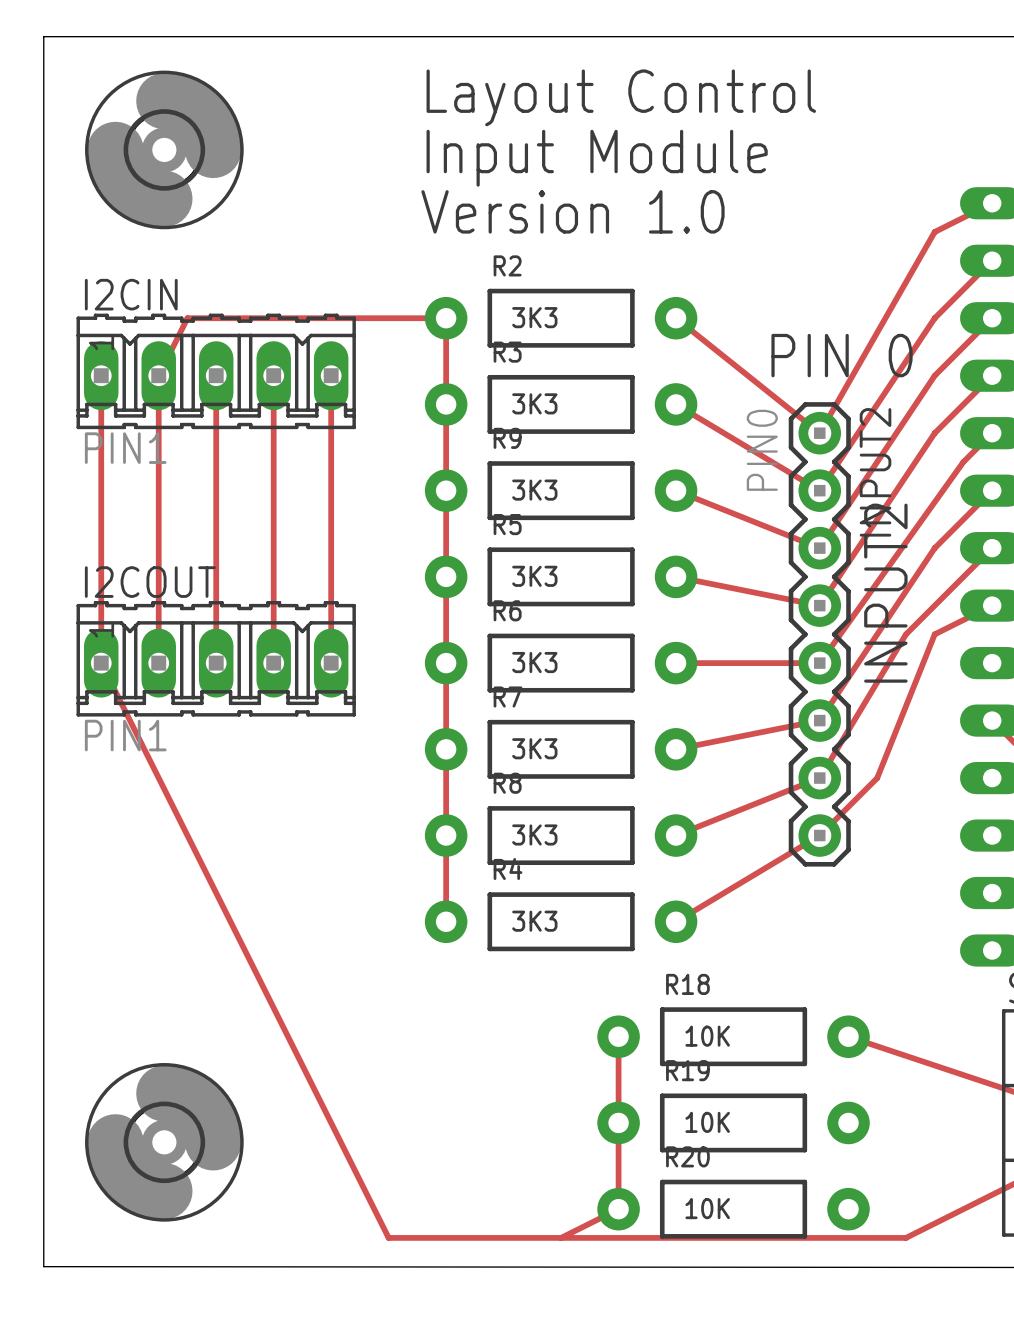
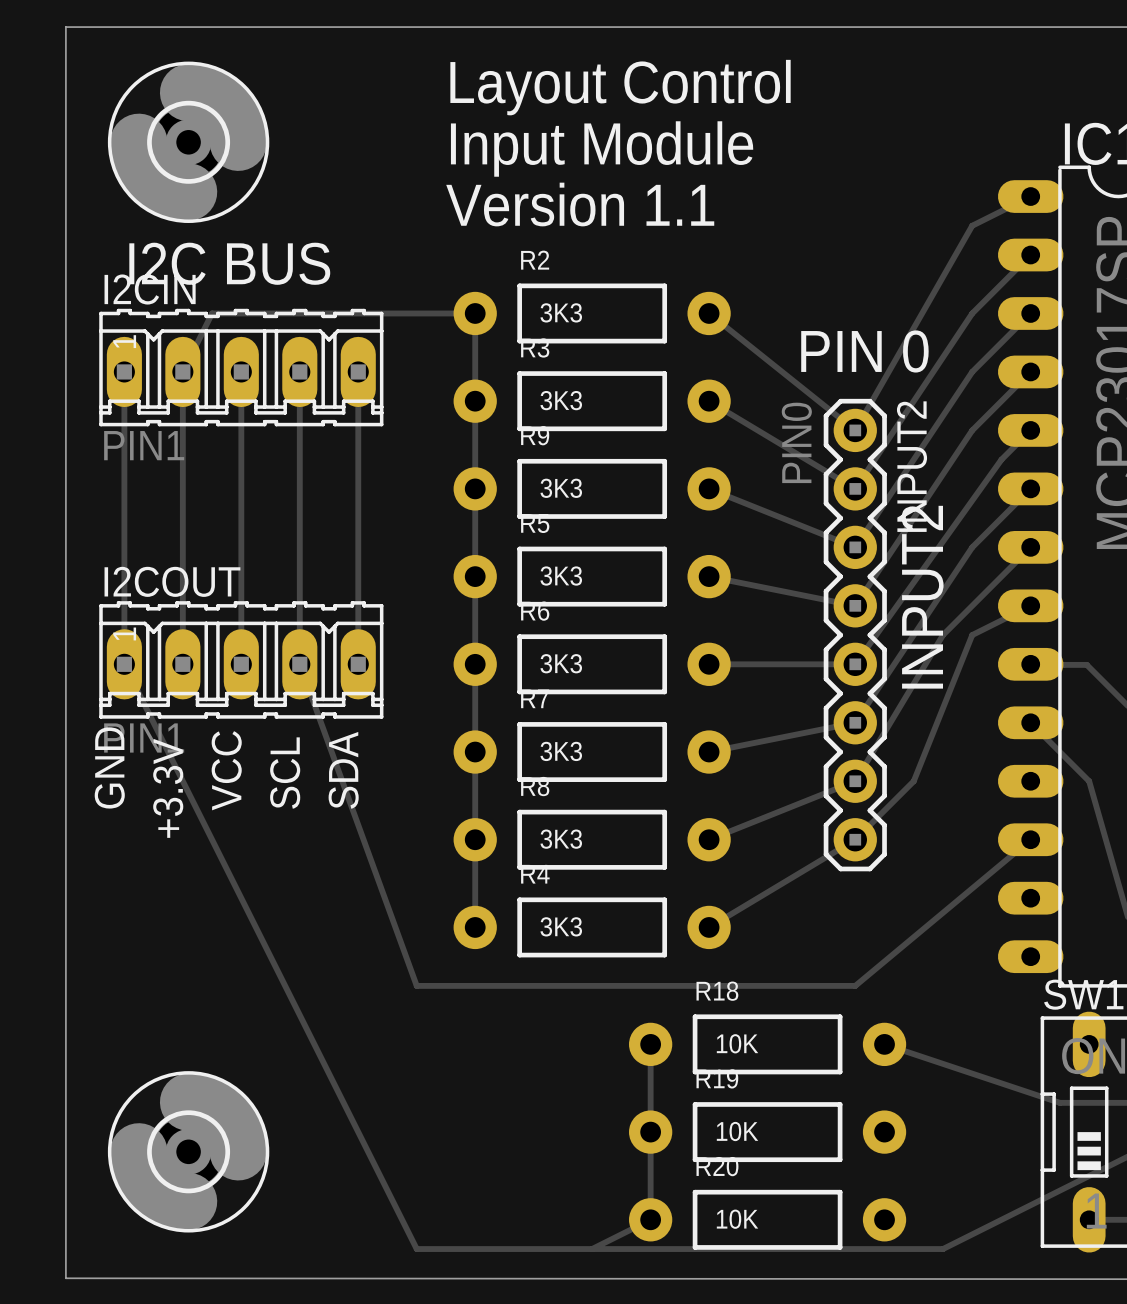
text: Version 1.0 (572, 211) -> Version 1.1 (580, 204)
text: none -> I2C BUS (229, 263)
track: none -> (299, 664) (416, 985) (855, 985) (1030, 839)
text: none -> GND (109, 767)
text: none -> SDA (343, 770)
text: none -> SCL (285, 773)
text: none -> VCC (226, 770)
text: none -> +3.3V (168, 788)

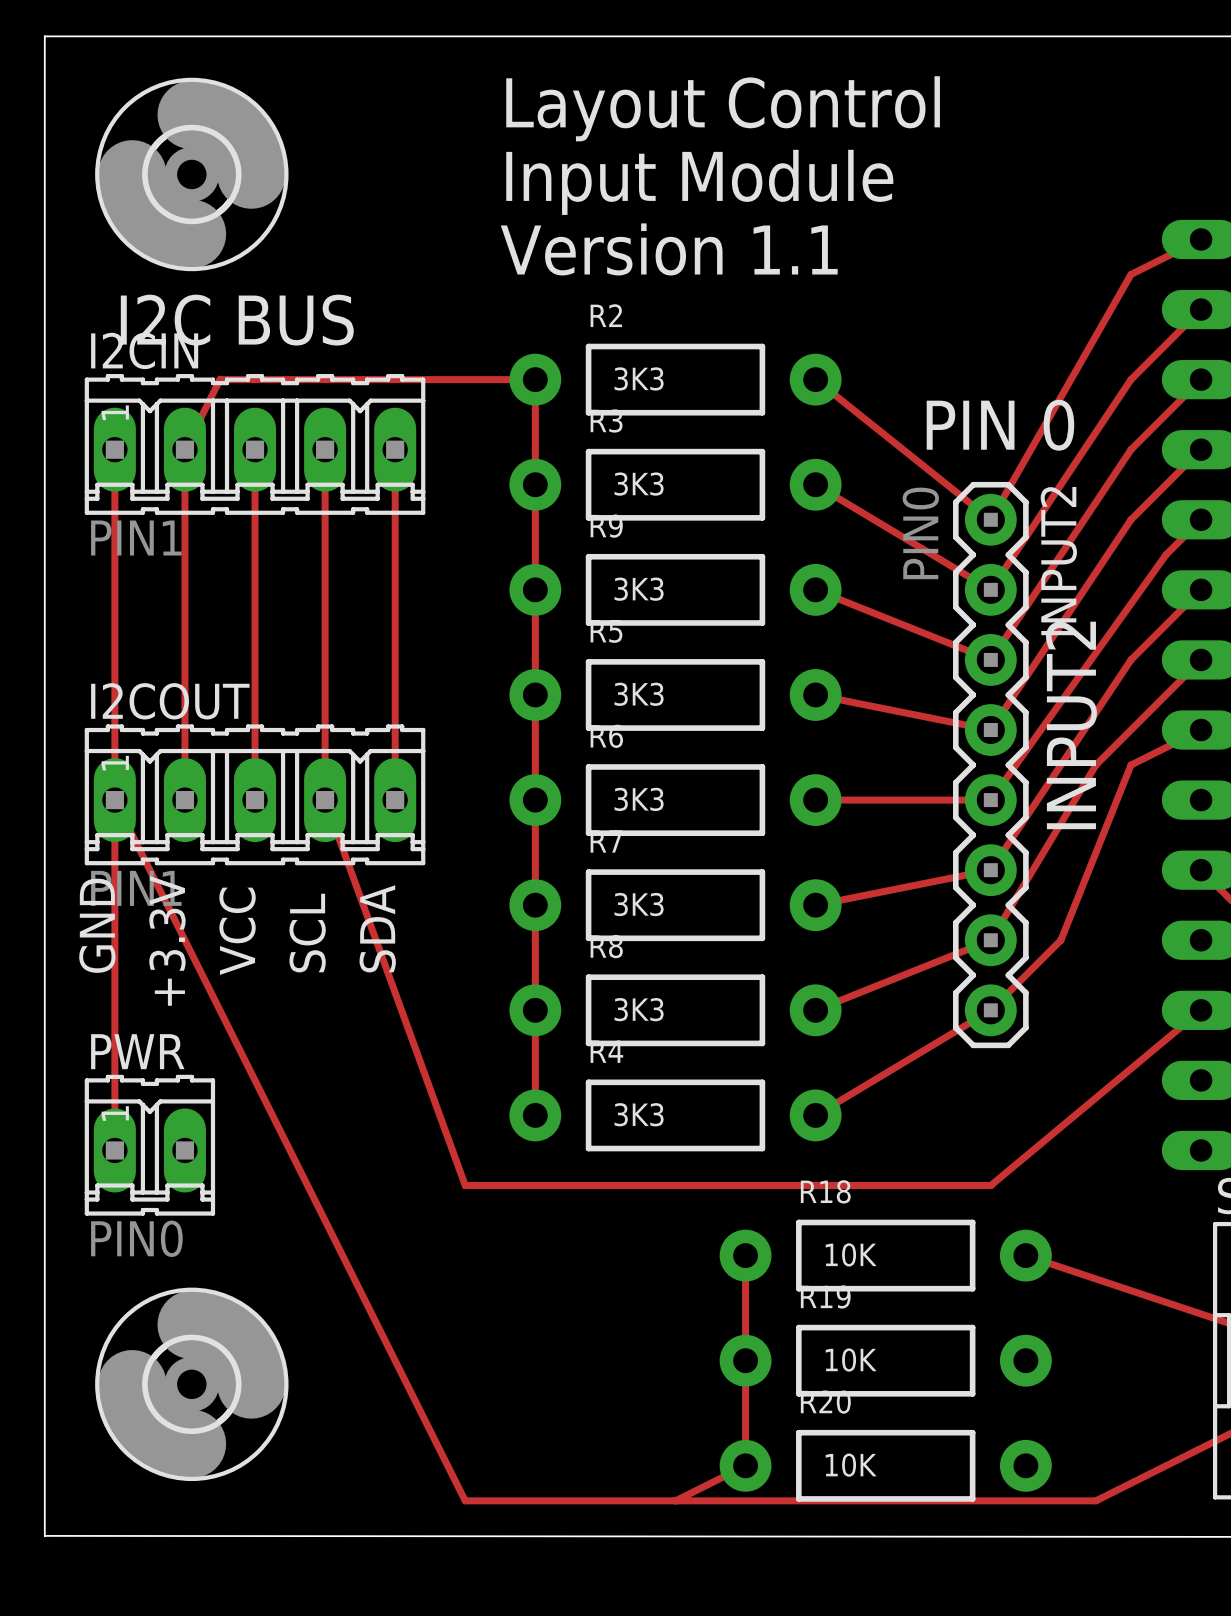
track: none -> (114, 800) (114, 1150)
PWR: none -> PIN0 (149, 1145)

